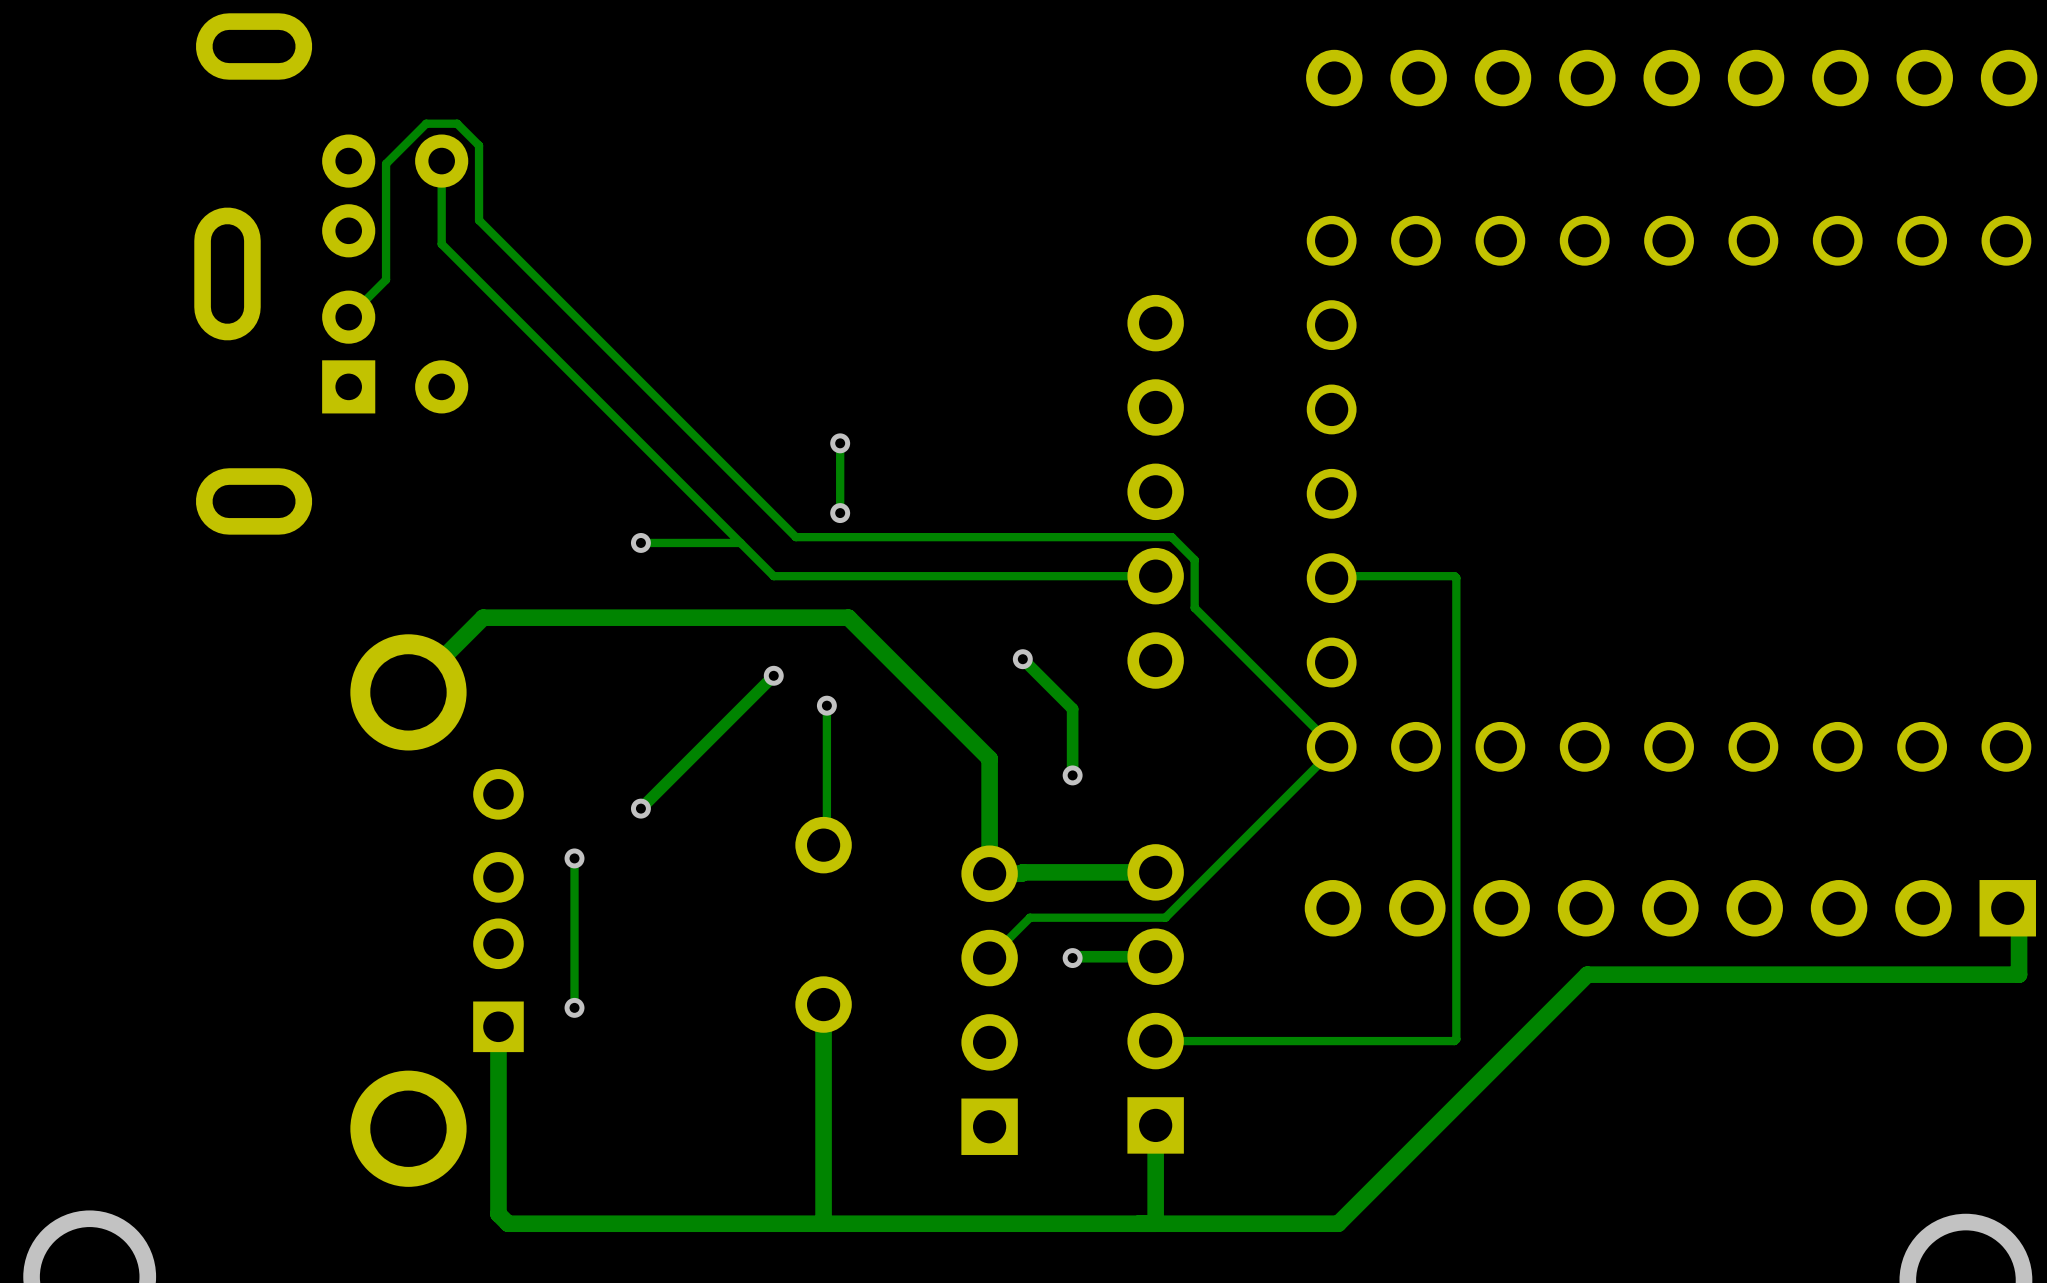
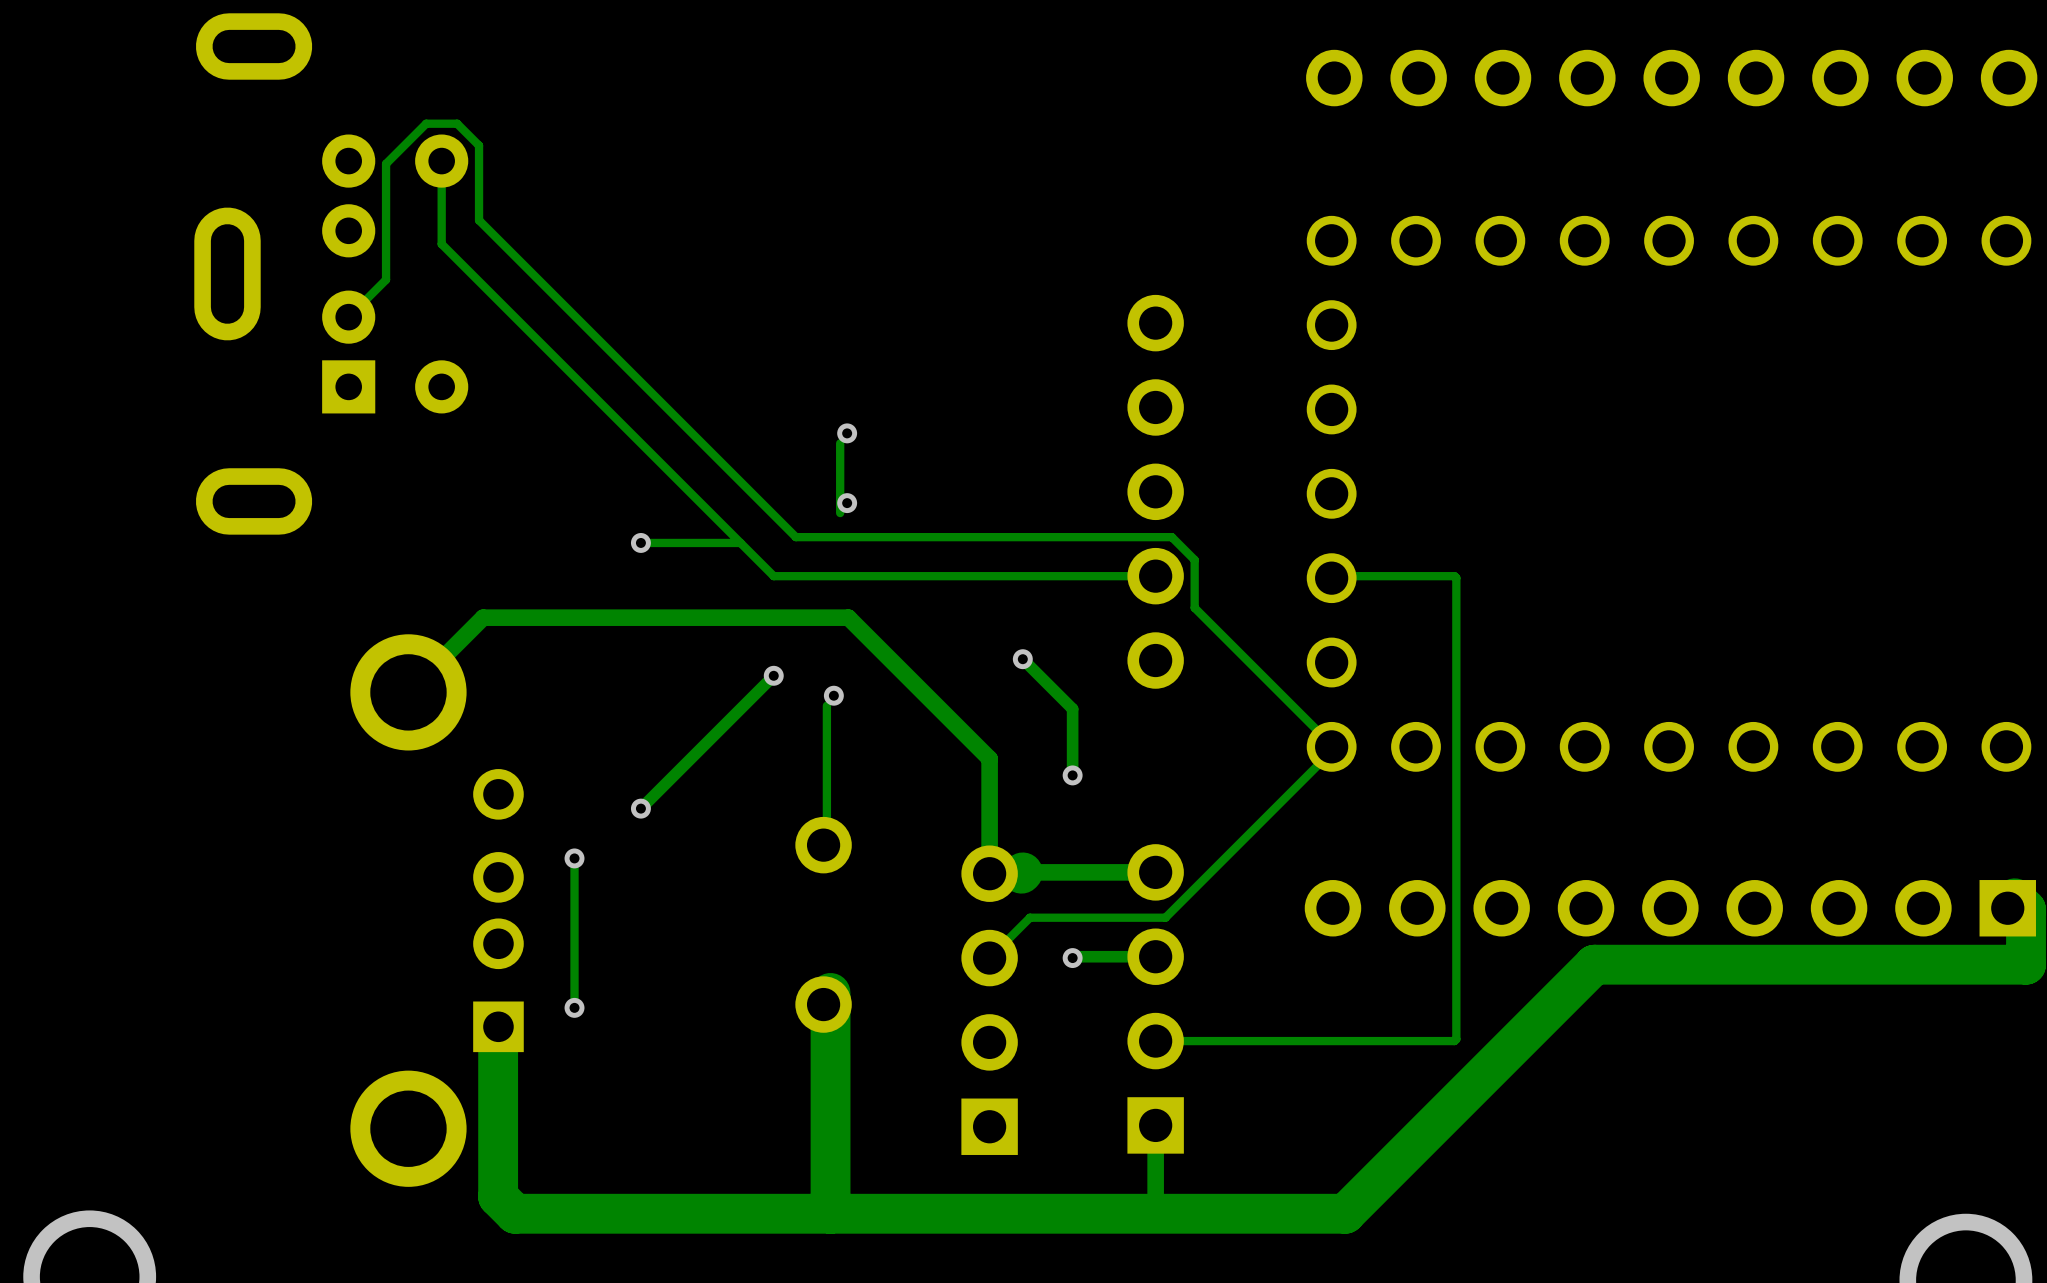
via position: (840, 443) -> (847, 433)
via position: (840, 513) -> (847, 503)
via position: (826, 705) -> (833, 695)
track: (2007, 908) (2019, 919) (2019, 974) (1587, 974) (1338, 1223) (508, 1223) (498, 1214) (498, 1026) -> (2014, 898) (2026, 909) (2026, 964) (1594, 964) (1345, 1213) (515, 1213) (498, 1196) (498, 1027)
track: (823, 1002) (823, 1223) -> (830, 992) (830, 1213)

